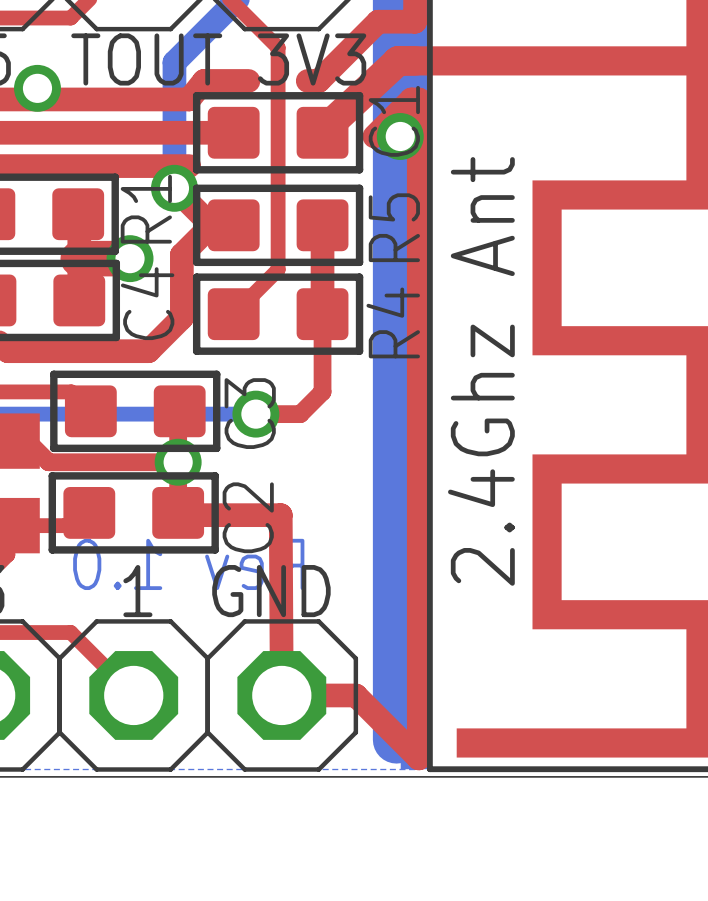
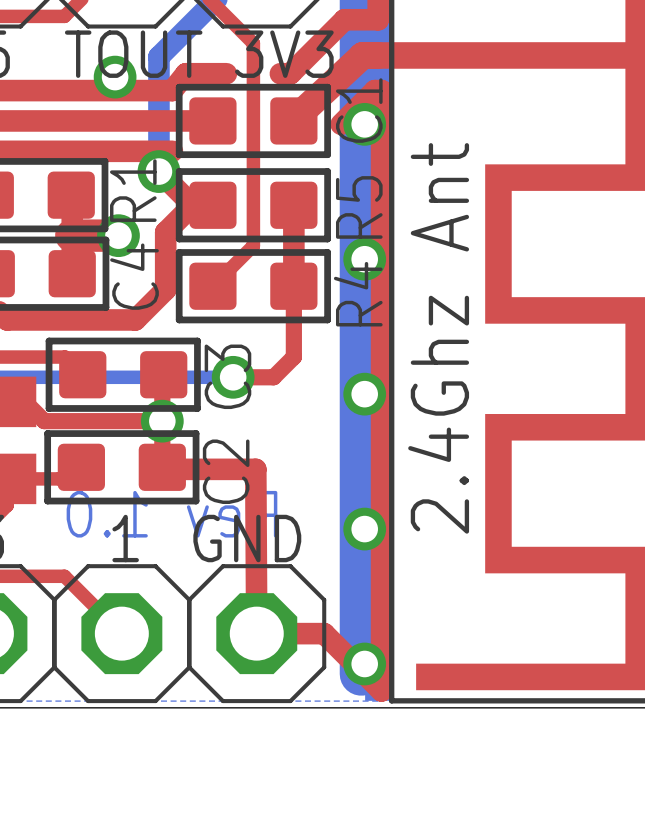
via: none -> (115, 77)
via: (37, 88) -> none
via: none -> (364, 259)
via: none -> (364, 394)
via: none -> (364, 529)
via: none -> (364, 663)

